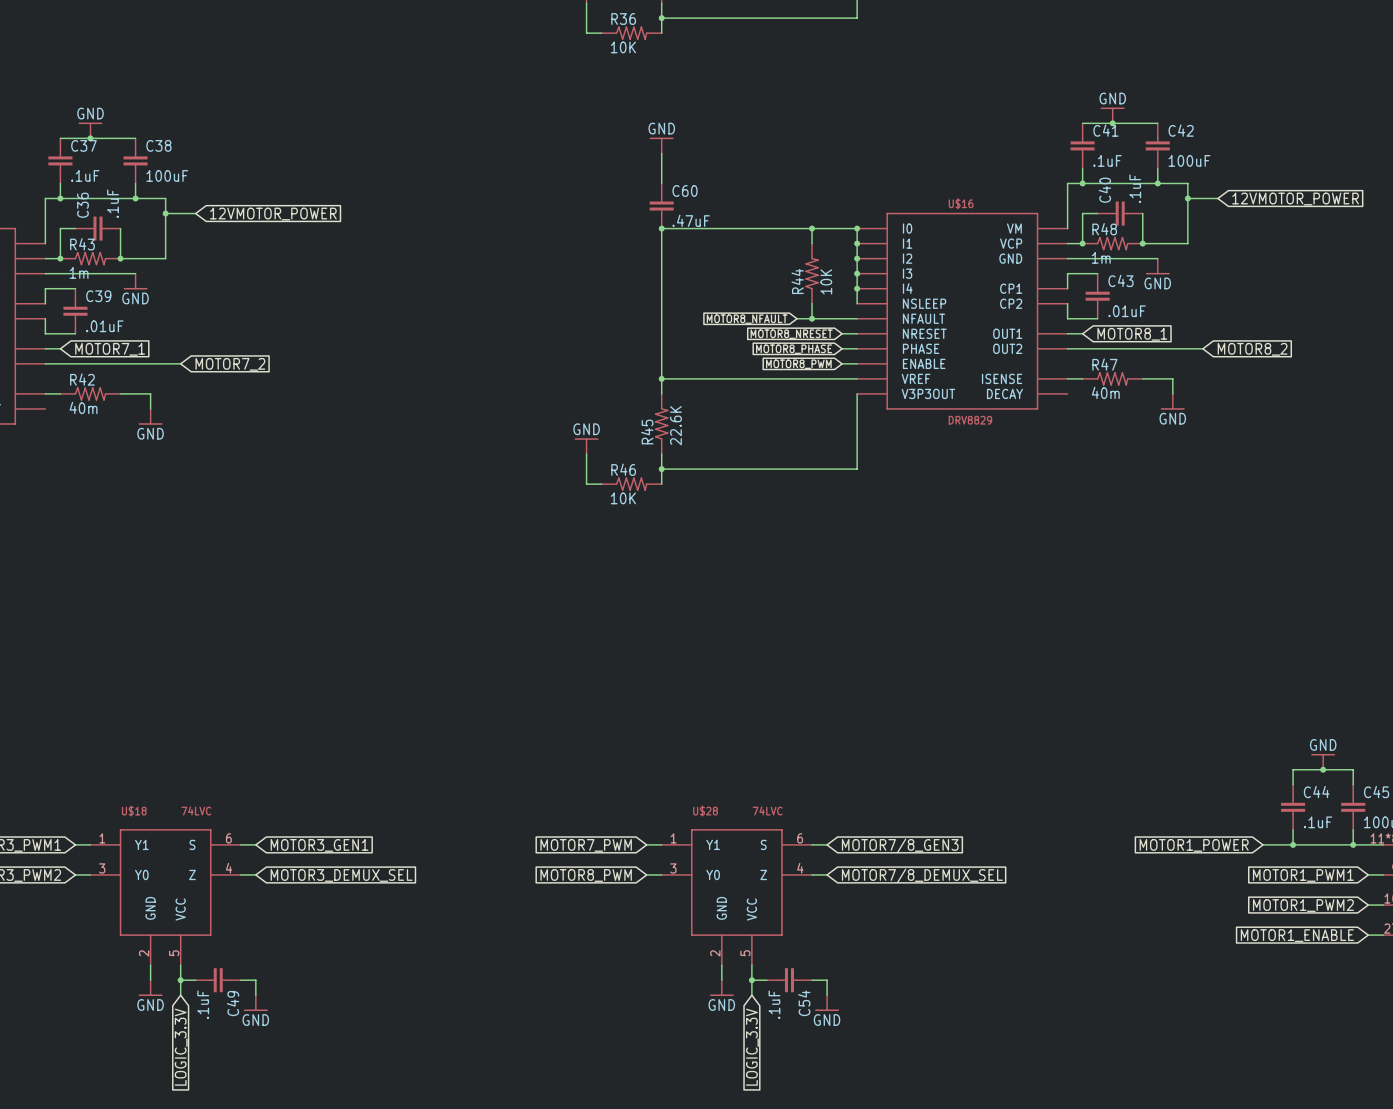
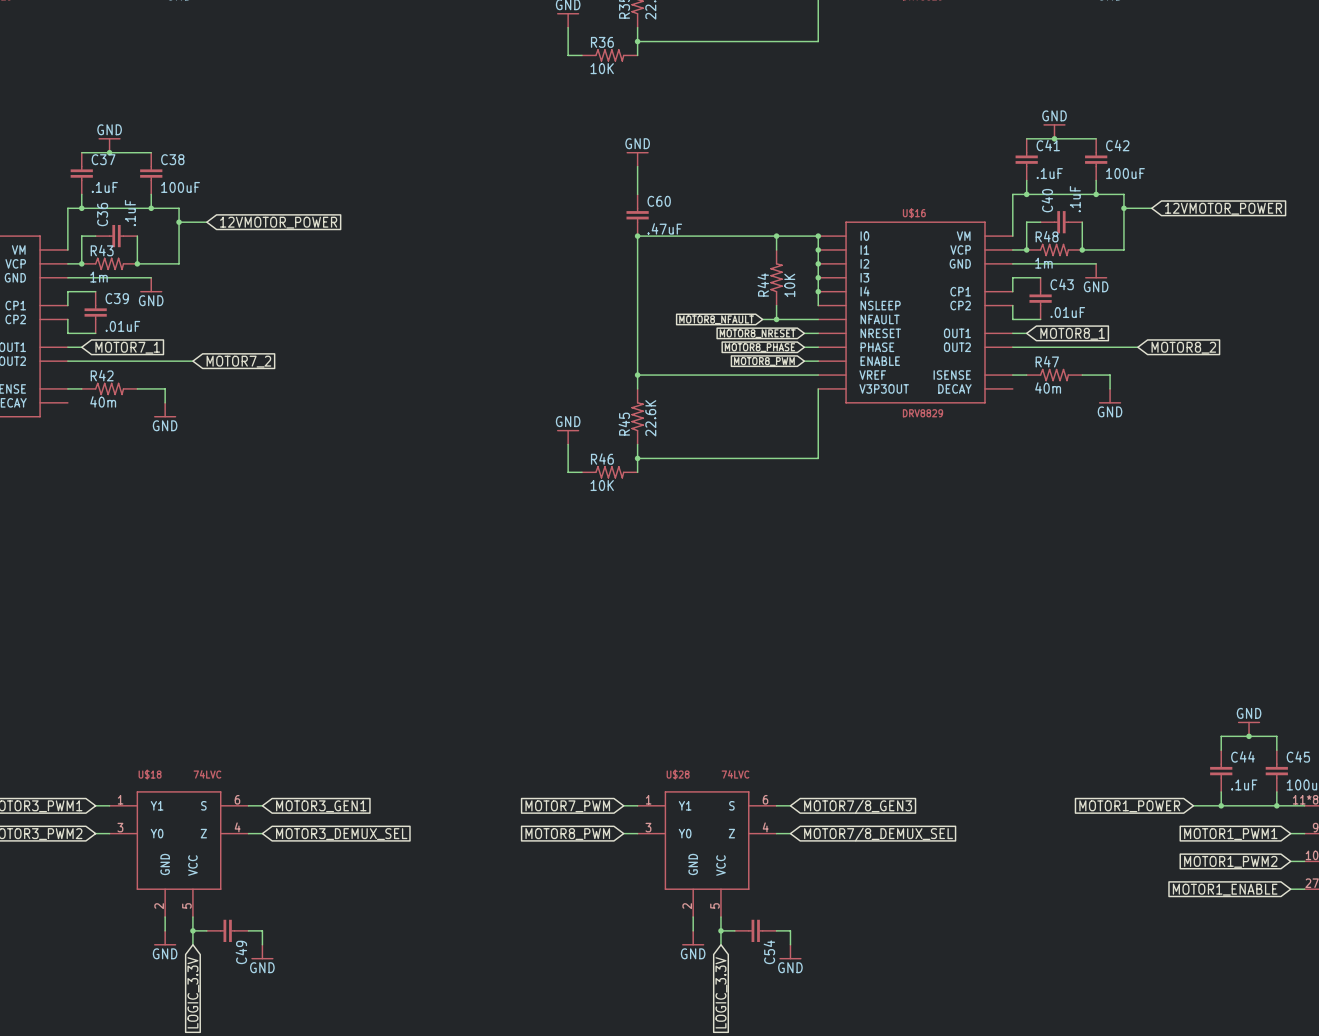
C49 value: .1uF (203, 1004) -> none
C54 value: .1uF (774, 1004) -> none

